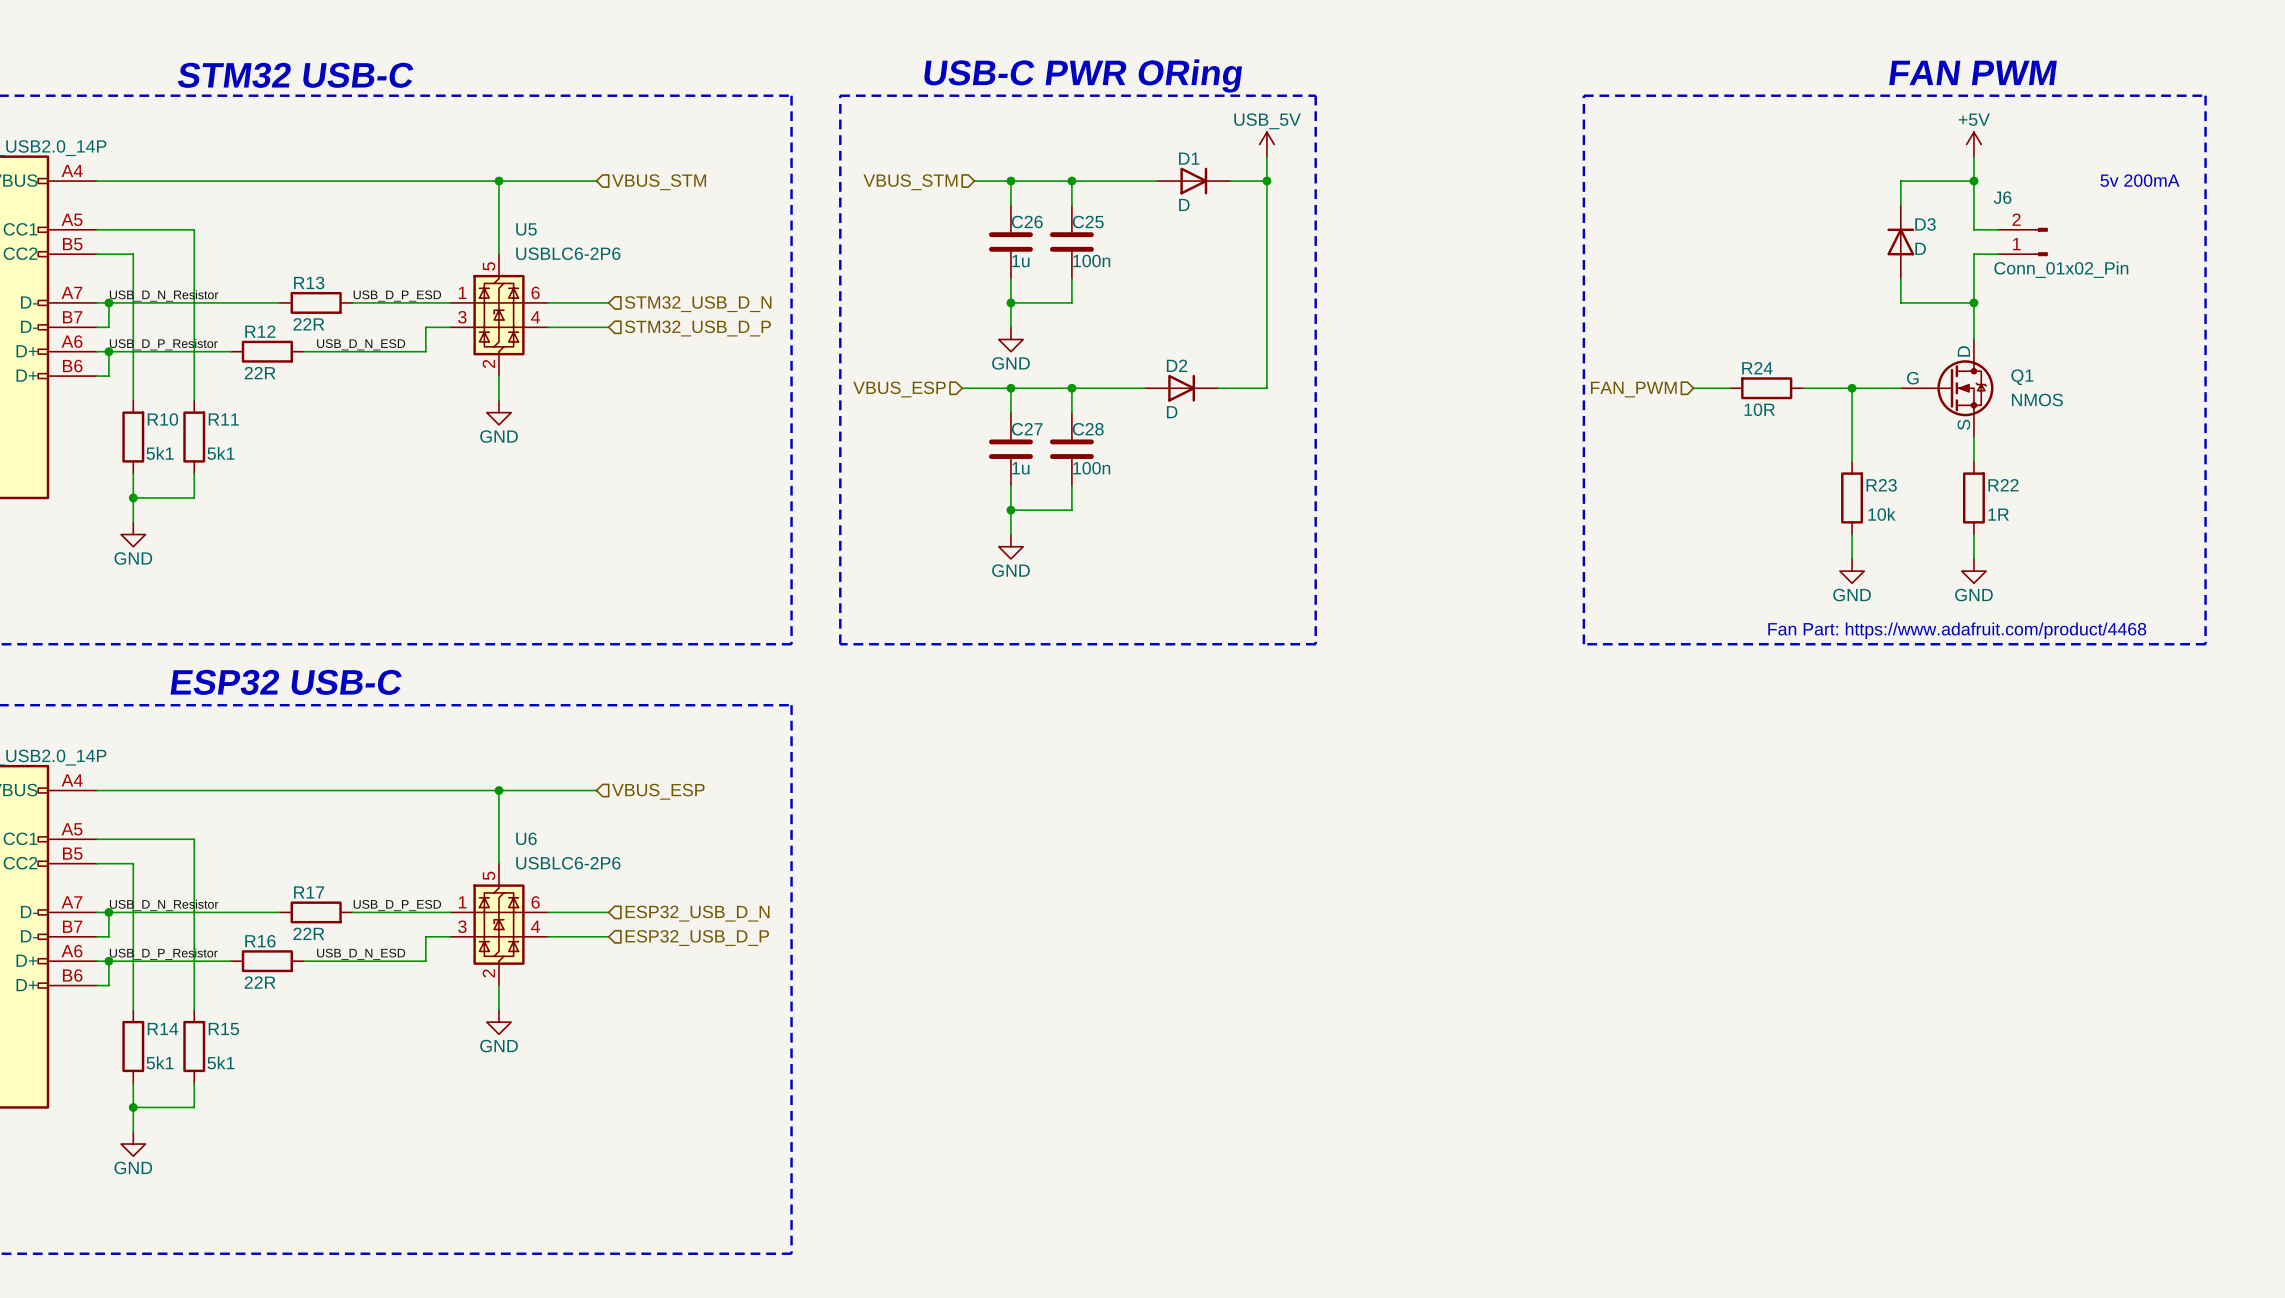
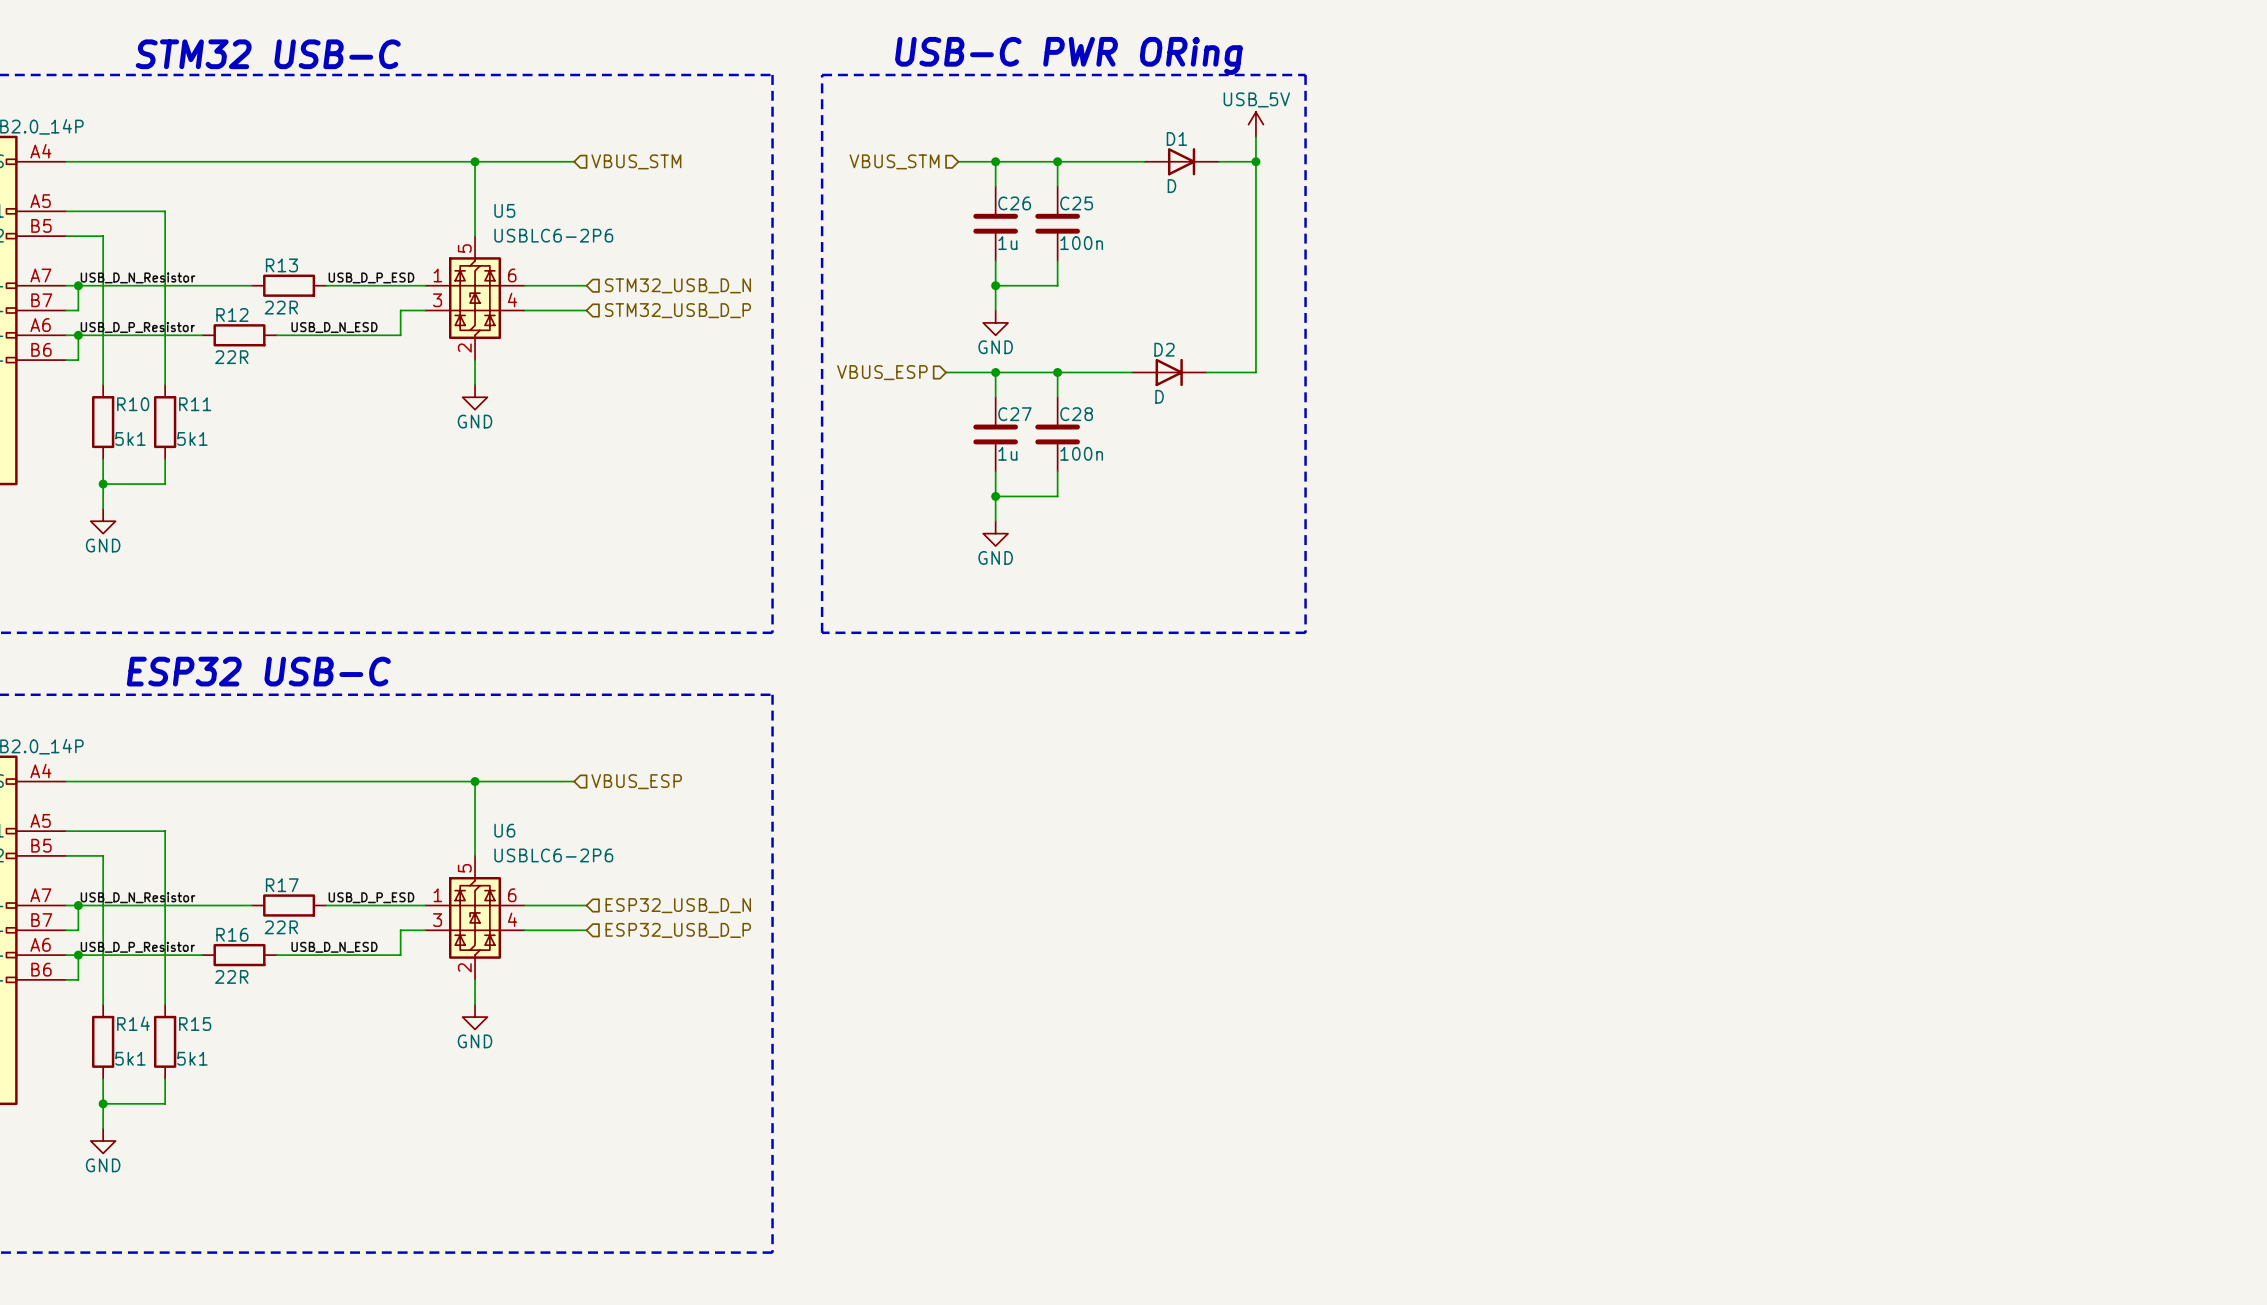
text: FAN PWM (1973, 72) -> none
line: (1583, 95) (2205, 95) (2205, 644) (1583, 644) (1583, 95) -> none
power symbol: +5V (1973, 144) -> none
wire: (1973, 156) (1973, 229) (1998, 229) -> none
text: 5v 200mA (2140, 180) -> none
wire: (1973, 181) (1900, 181) (1900, 205) -> none
junction: (1973, 181) -> none
D3: D (1900, 241) -> none
J6: Conn_01x02_Pin (2023, 241) -> none
wire: (1998, 254) (1973, 254) (1973, 339) -> none
wire: (1900, 278) (1900, 302) (1973, 302) -> none
junction: (1973, 302) -> none
wire: (1693, 388) (1730, 388) -> none
R24: 10R (1766, 388) -> none
wire: (1803, 388) (1900, 388) -> none
wire: (1852, 388) (1852, 461) -> none
junction: (1852, 388) -> none
Q1: NMOS (1947, 388) -> none
hierarchical label: FAN_PWM (1633, 389) -> none
wire: (1973, 437) (1973, 461) -> none
R23: 10k (1852, 497) -> none
R22: 1R (1973, 497) -> none
wire: (1852, 534) (1852, 558) -> none
wire: (1973, 534) (1973, 558) -> none
power symbol: GND (1852, 571) -> none
power symbol: GND (1973, 571) -> none
text: Fan Part: https://www.adafruit.com/product/4468 (1957, 630) -> none

